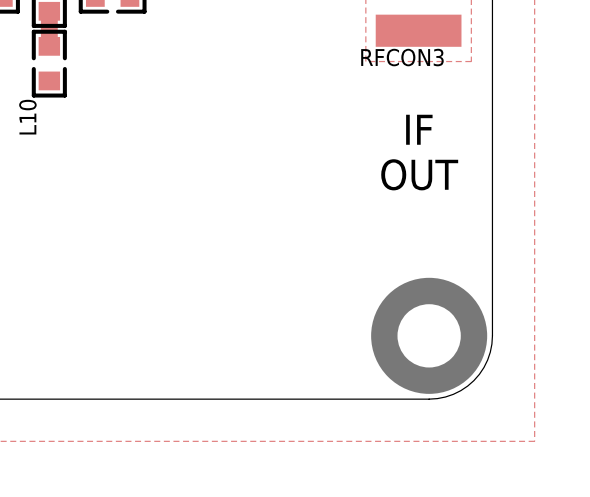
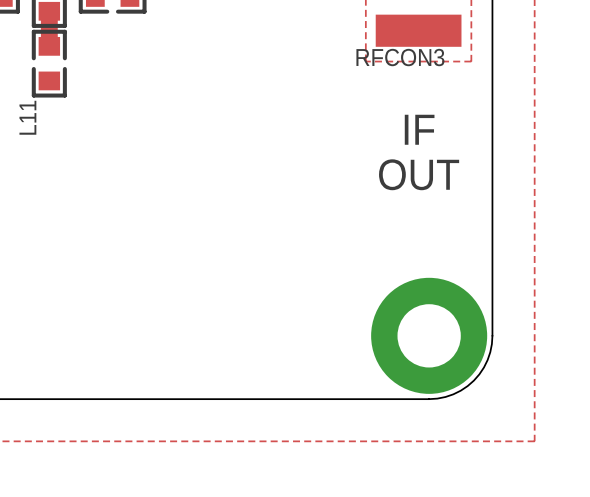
L10 name: L10 (27, 117) -> L11 (27, 117)

